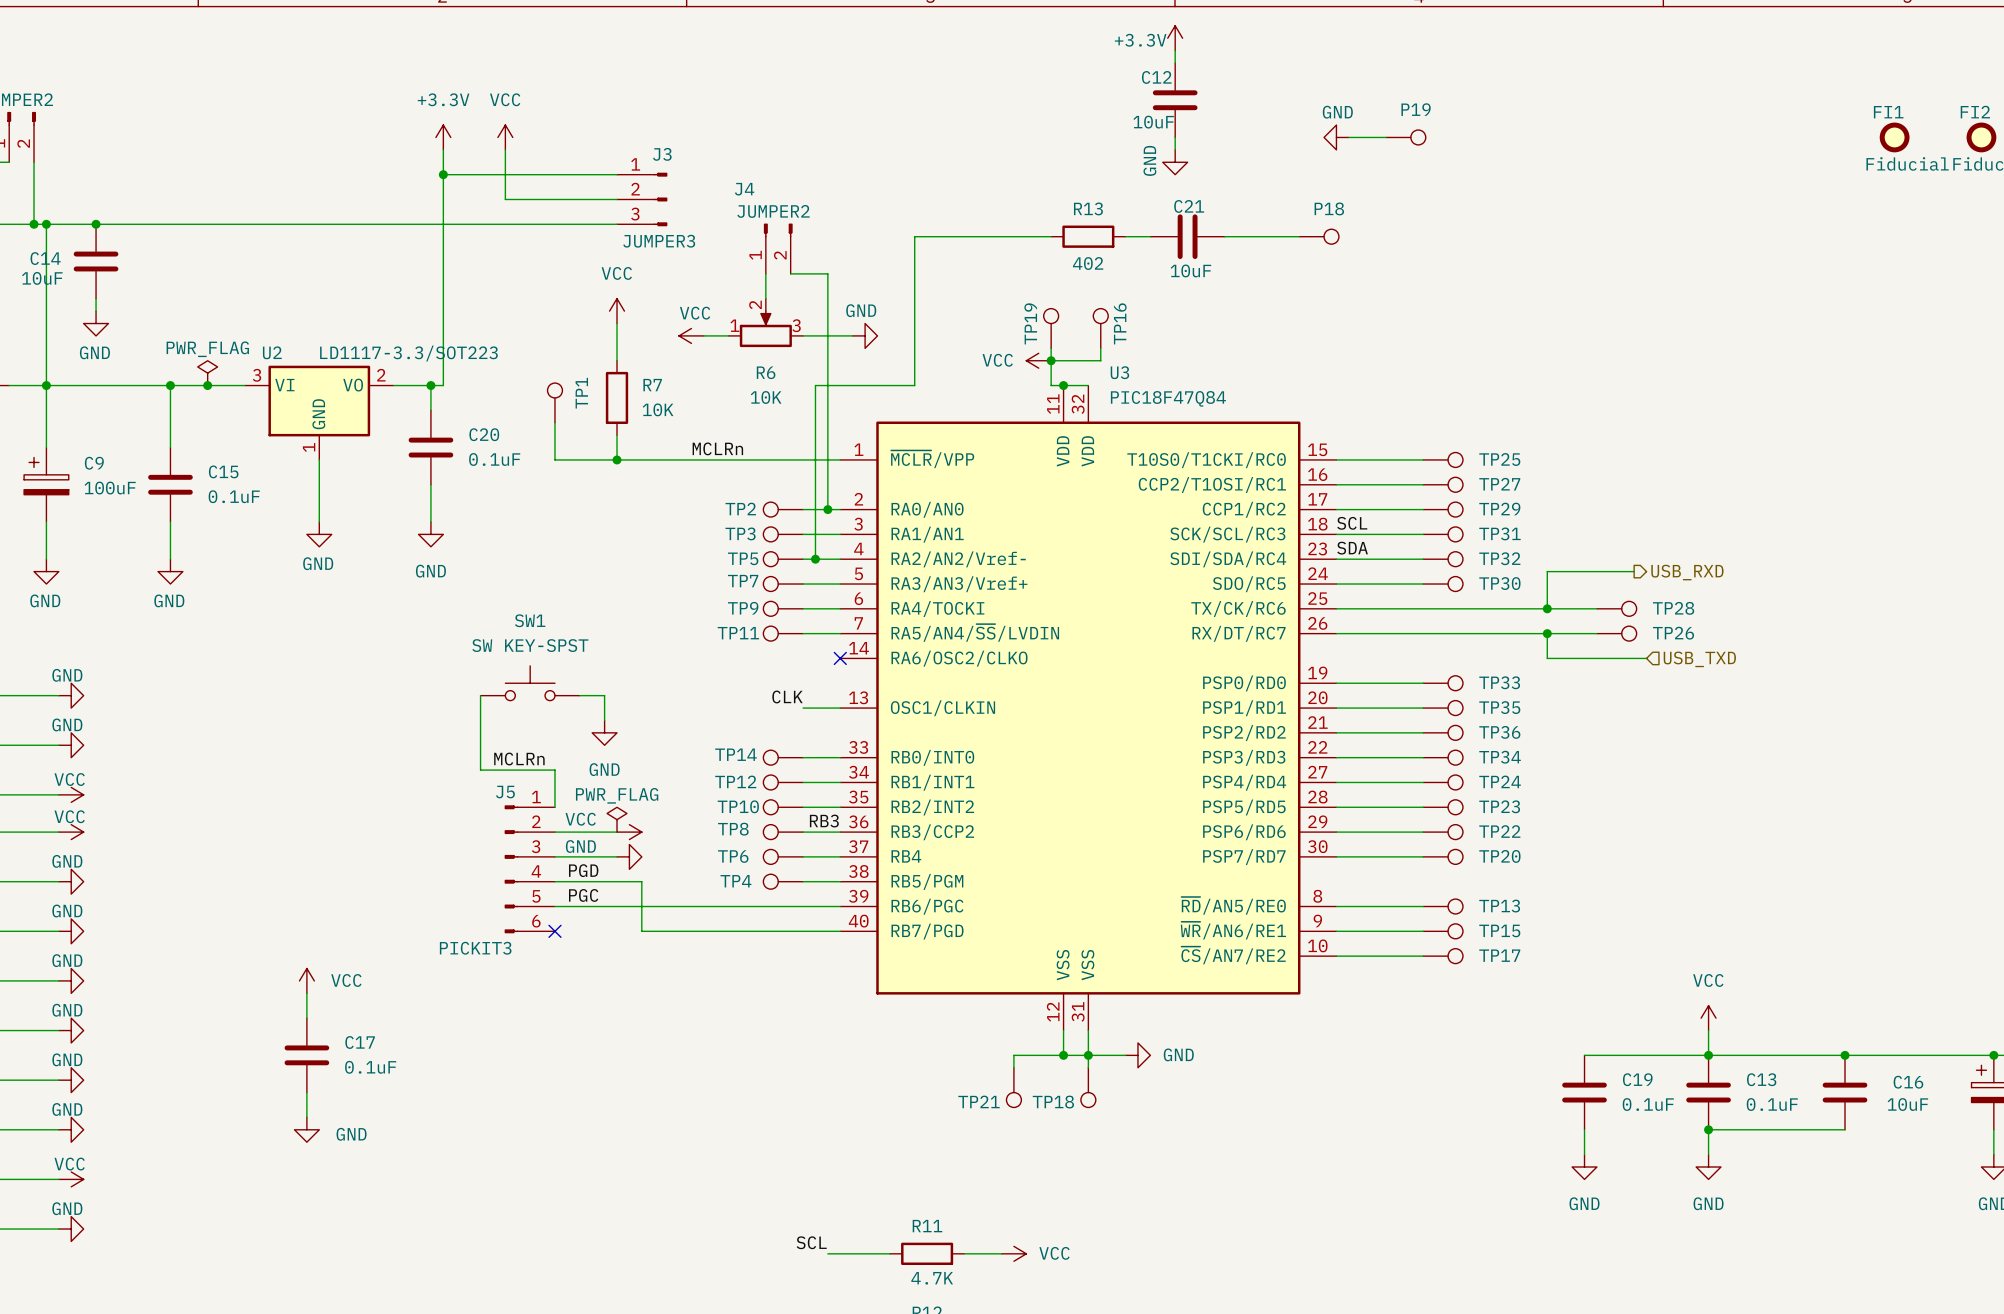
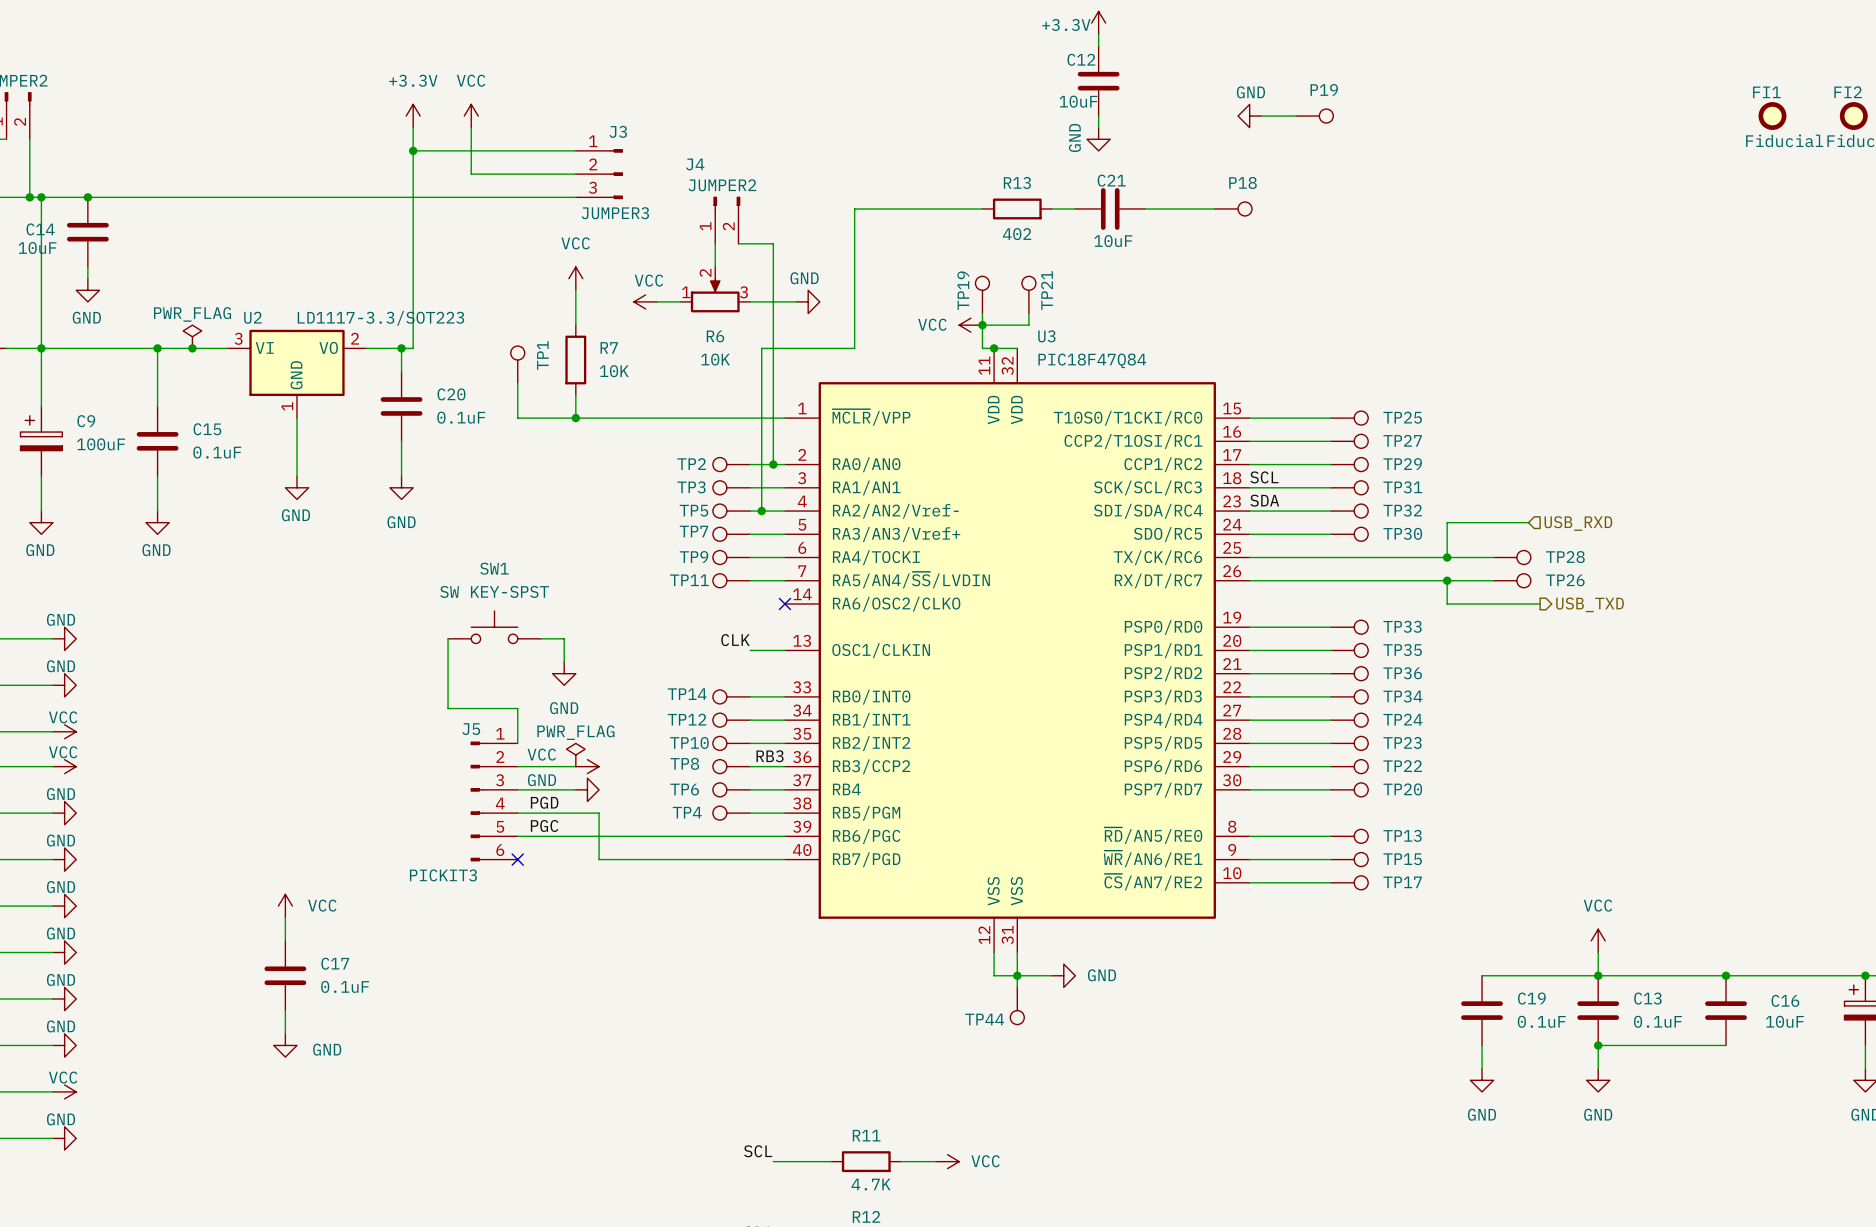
TP16 name: TP16 (1120, 323) -> TP21 (1046, 290)
label: MCLRn (717, 448) -> none
hierarchical label shape: output (1687, 572) -> input (1578, 523)
hierarchical label shape: input (1699, 659) -> output (1590, 604)
label: MCLRn (519, 759) -> none
wire: (1063, 1055) (1013, 1055) (1013, 1067) -> none
junction: (1063, 1055) -> none
TP21: (1013, 1087) -> none
TP18 name: TP18 (1053, 1102) -> TP44 (984, 1019)

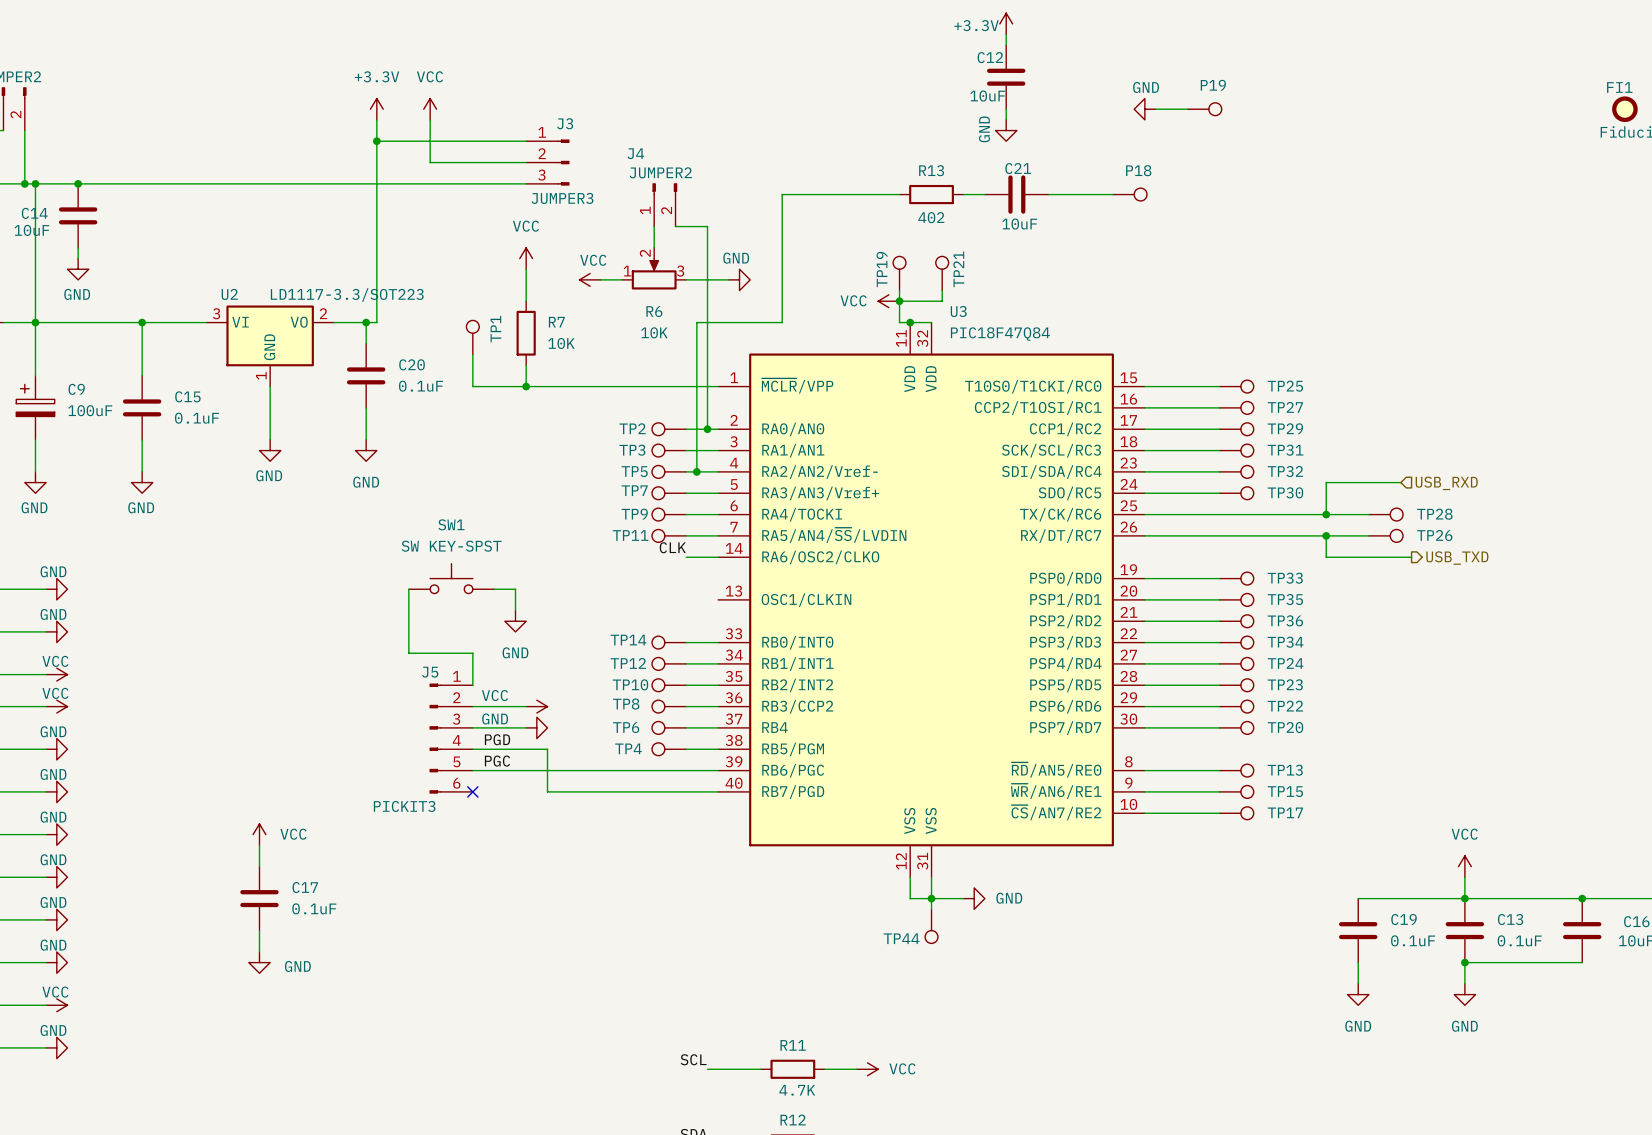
power symbol: PWR_FLAG (192, 336) -> none
junction: (192, 348) -> none
label: SCL (1264, 477) -> none
label: SDA (1264, 500) -> none
no-connect mark: (784, 603) -> none
label position: CLK (735, 640) -> CLK (672, 547)
wire: (750, 650) (784, 650) -> (686, 557) (718, 557)
power symbol: PWR_FLAG (575, 755) -> none
label: RB3 (770, 756) -> none

